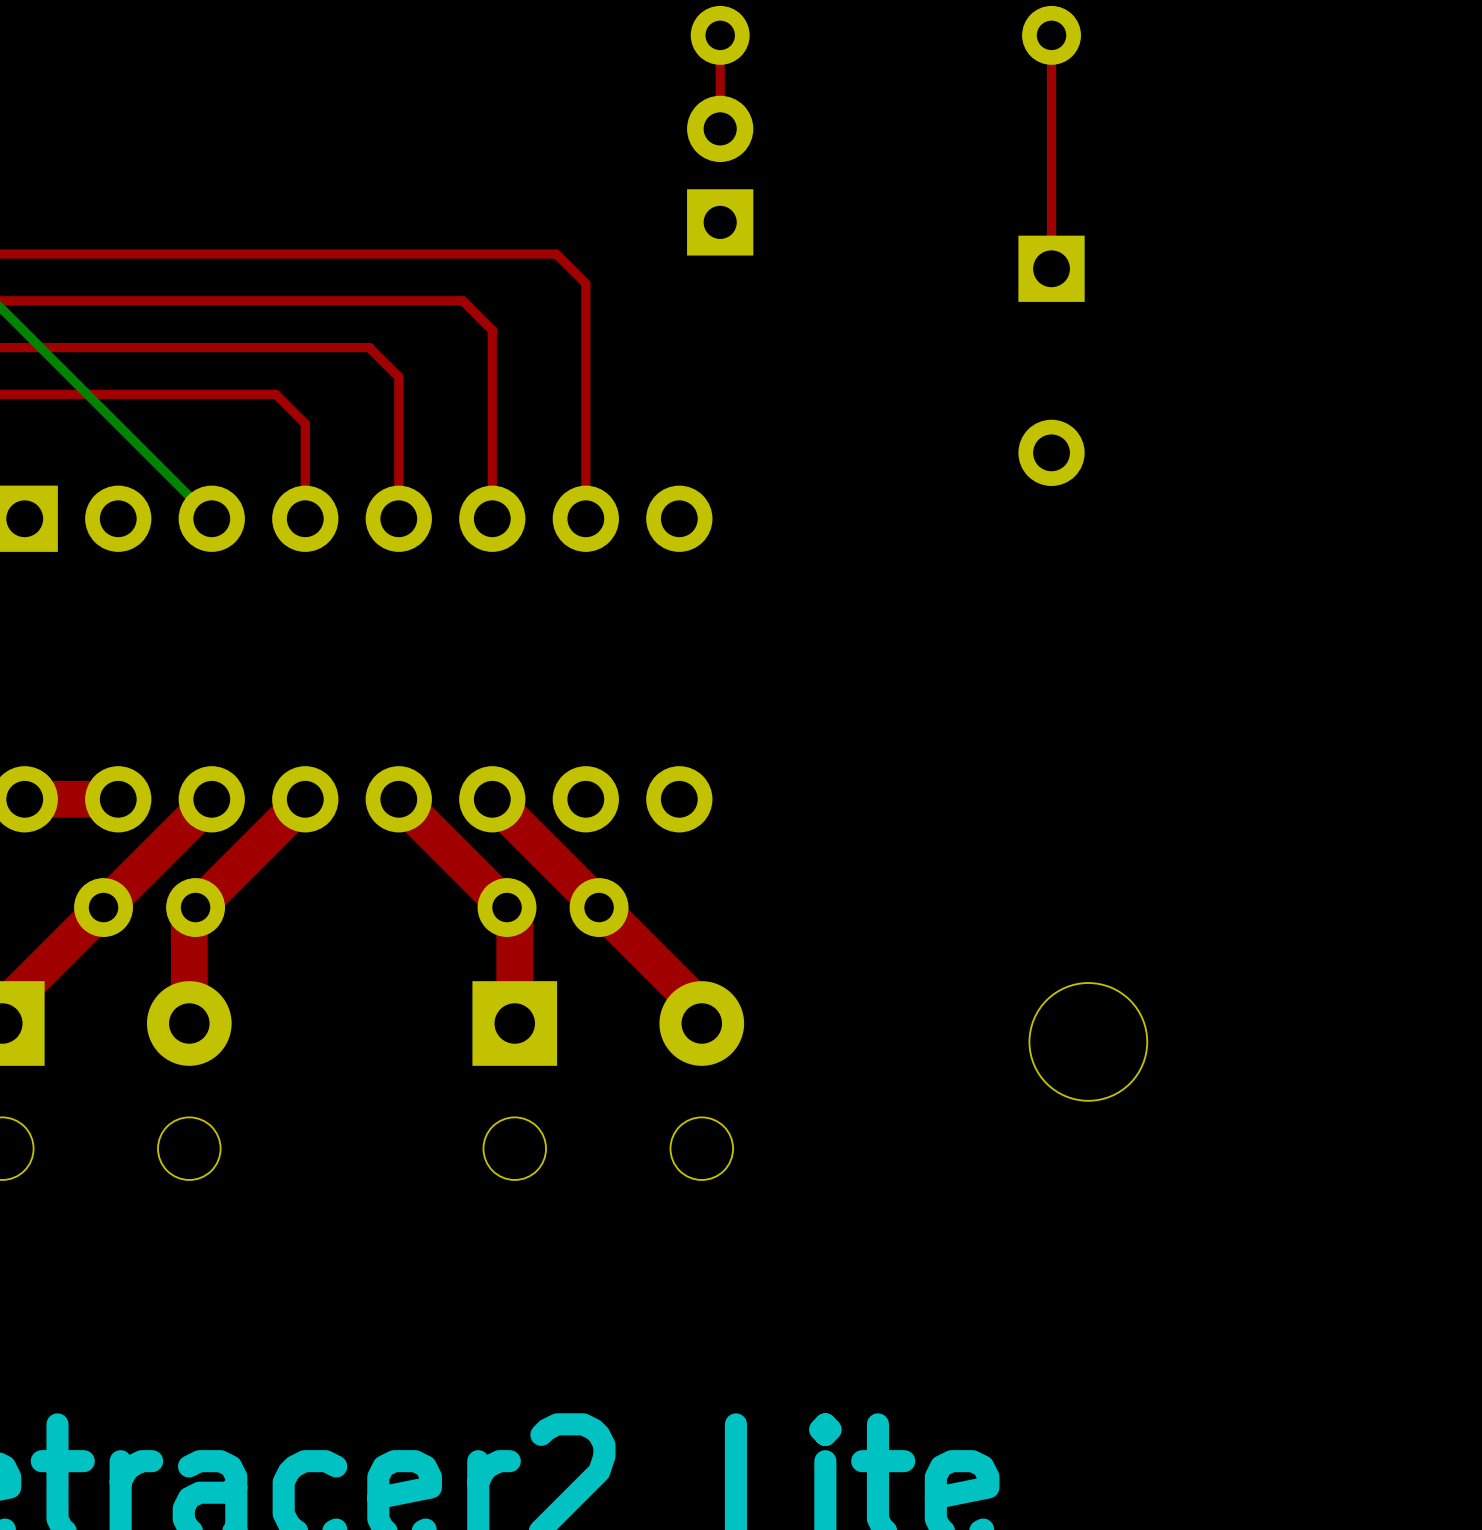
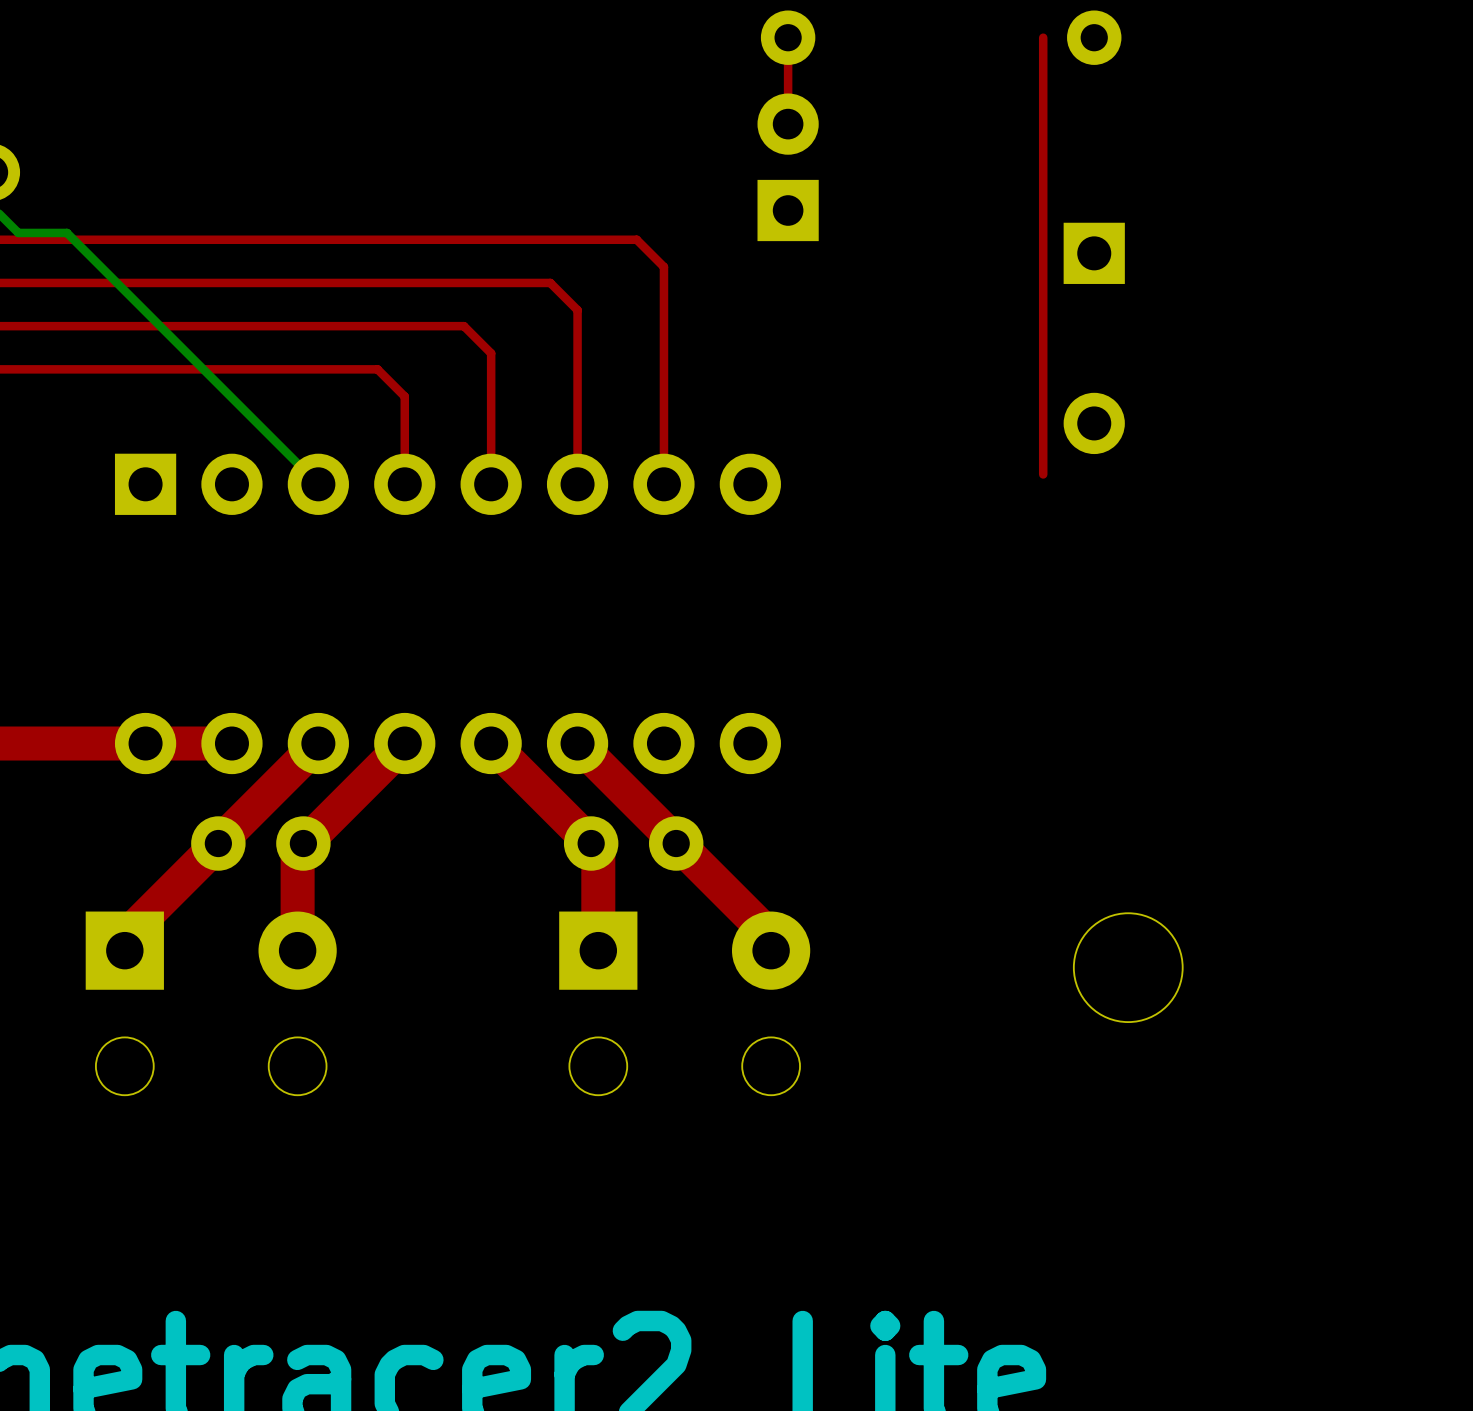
top track: none -> (1043, 37) (1043, 474)
top track: (1051, 35) (1051, 268) -> none

